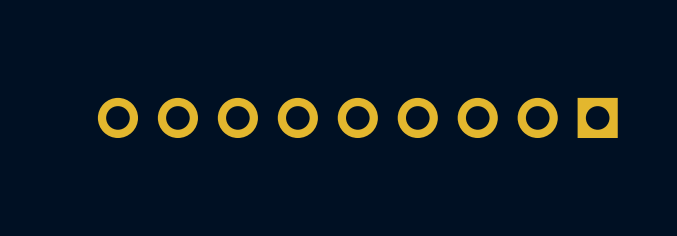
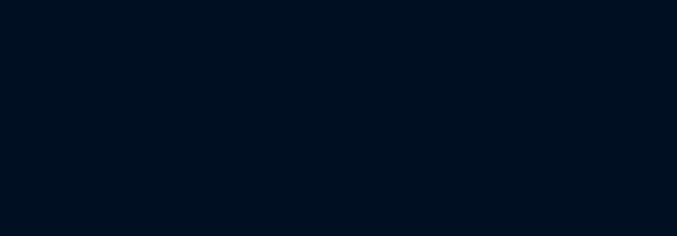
part: (357, 117) -> none

